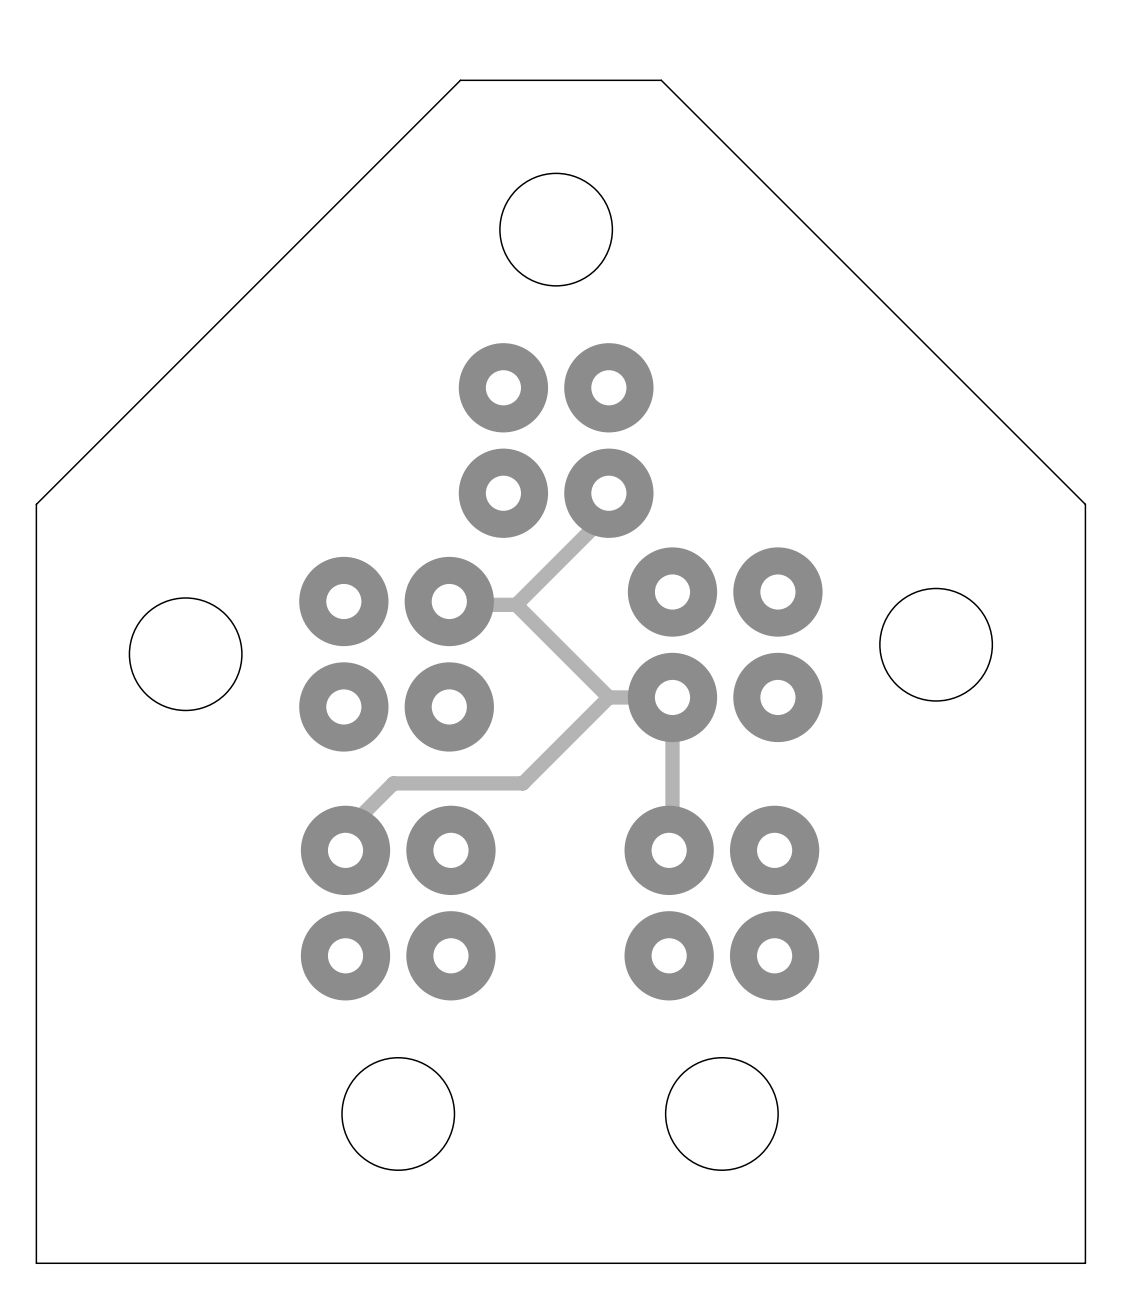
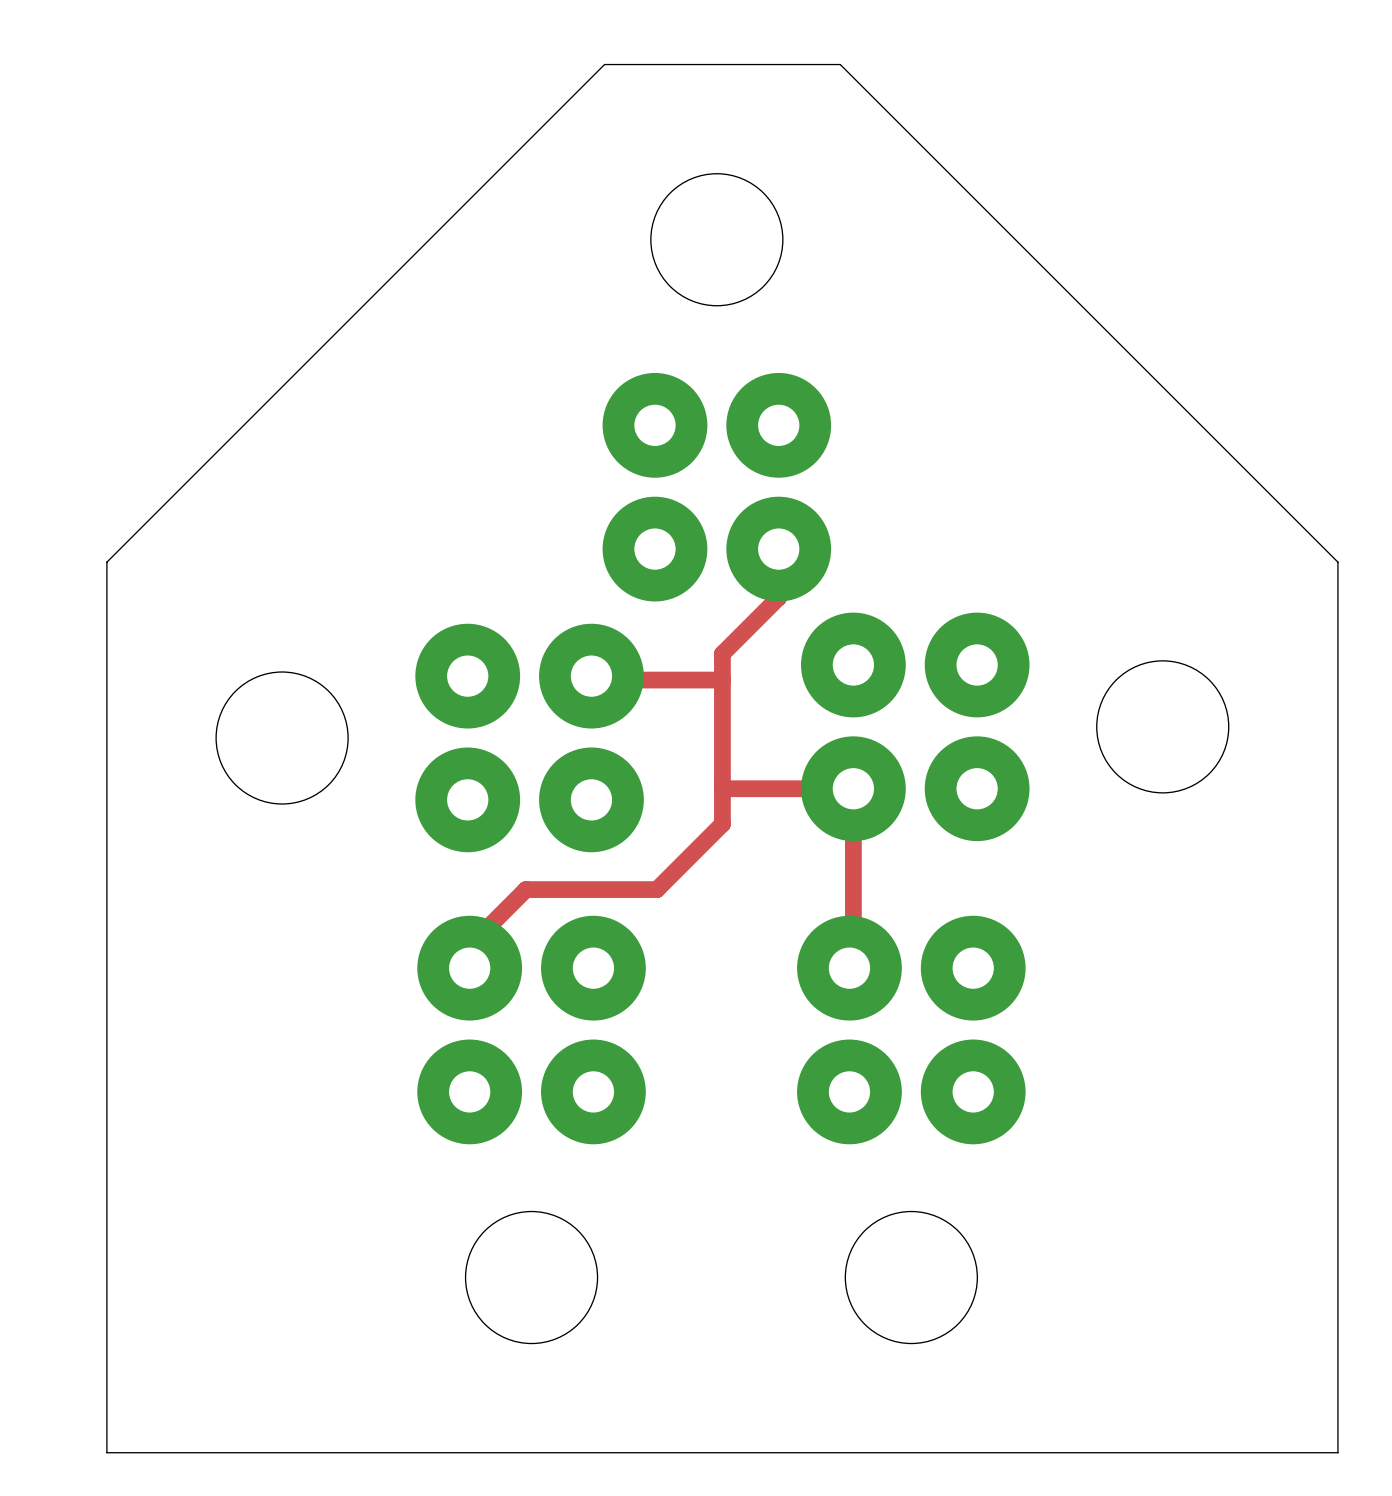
track: (608, 512) (516, 604) (608, 697) (522, 783) (505, 783) -> (778, 571) (778, 597) (722, 653) (722, 824) (656, 889)
track: none -> (670, 680) (722, 680)
track: none -> (722, 784) (726, 788) (778, 788)

